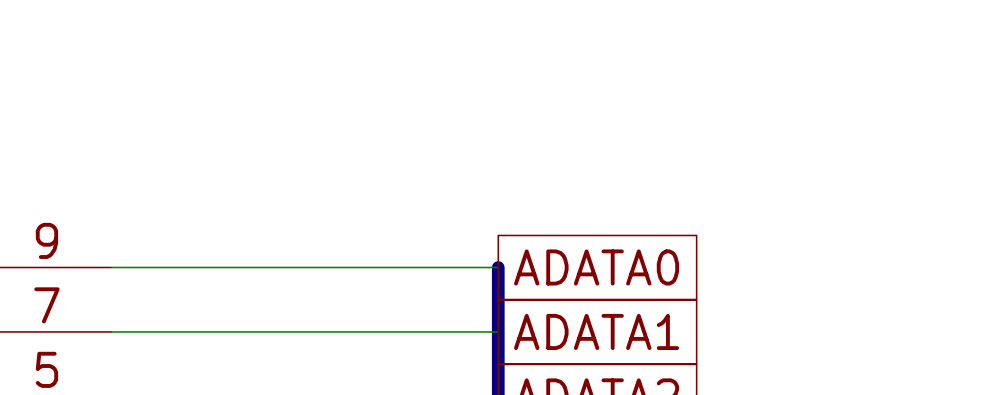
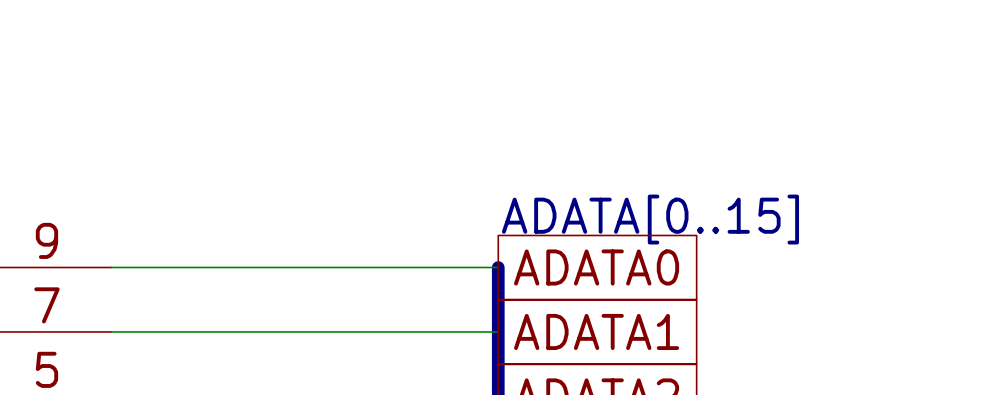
text: none -> ADATA[0..15] (650, 219)

